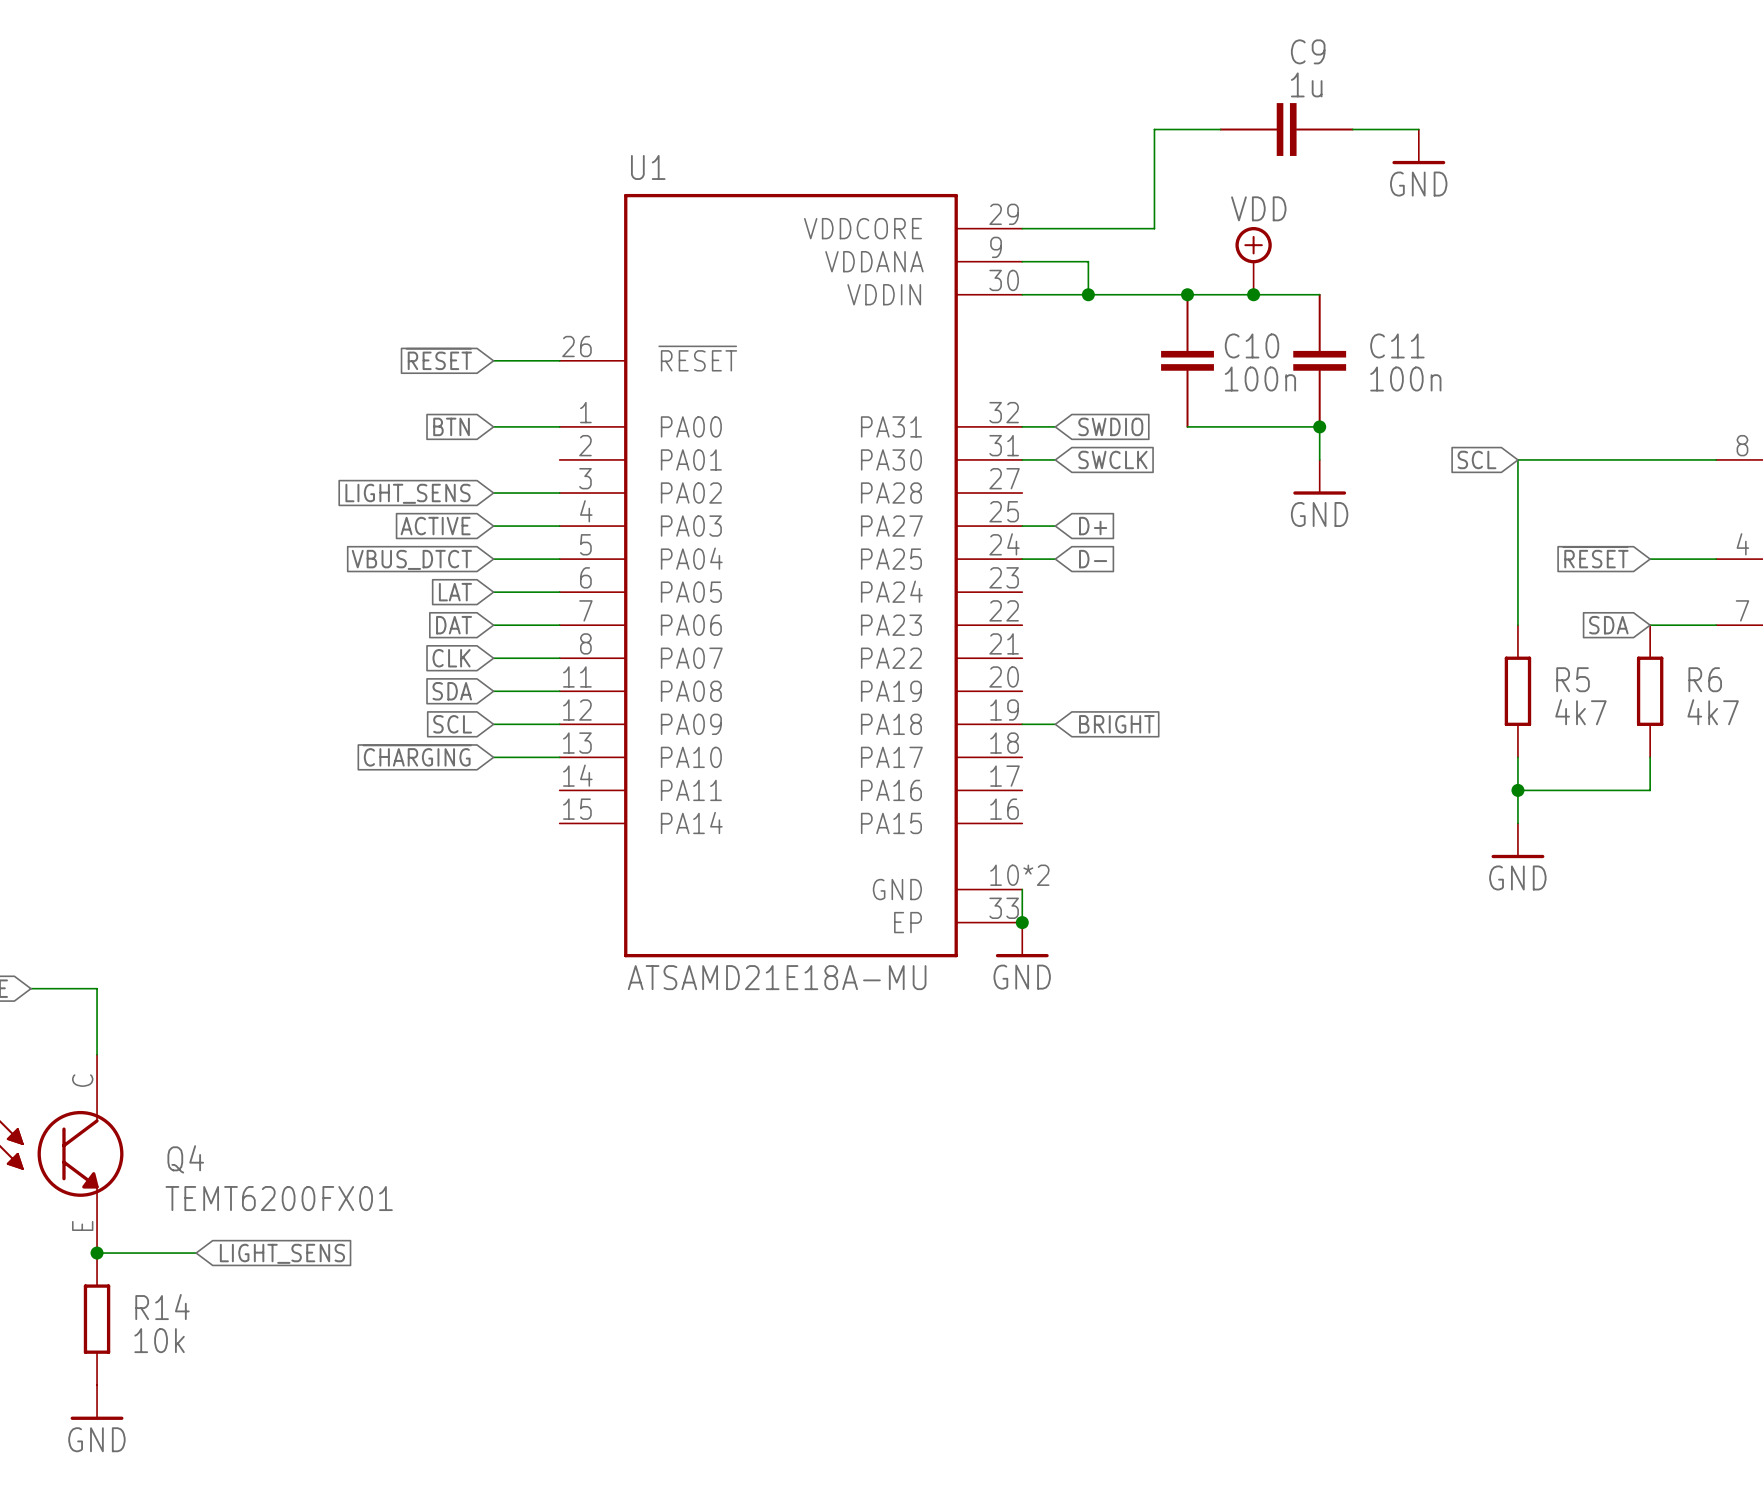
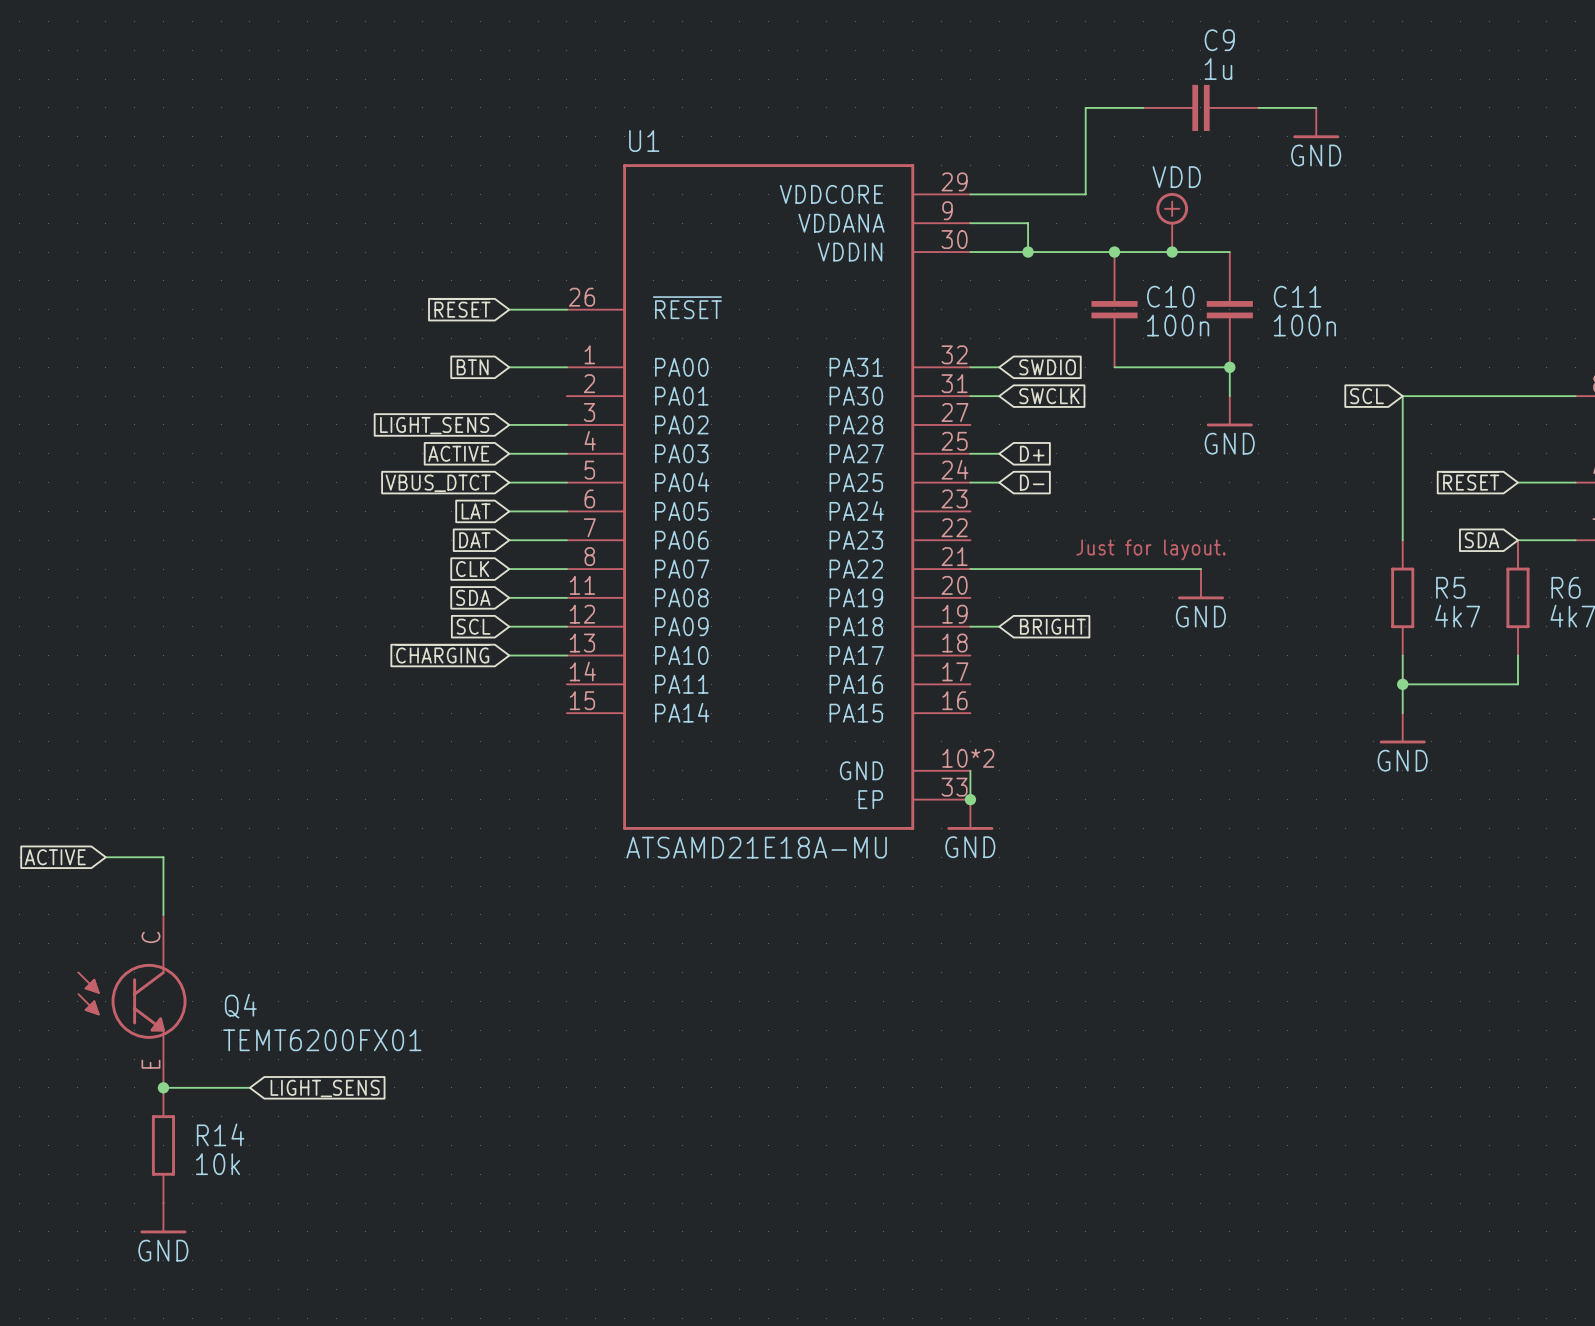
text: none -> Just for layout. (1150, 549)
wire: none -> (970, 569) (1200, 569)
power symbol: none -> GND (1200, 584)

